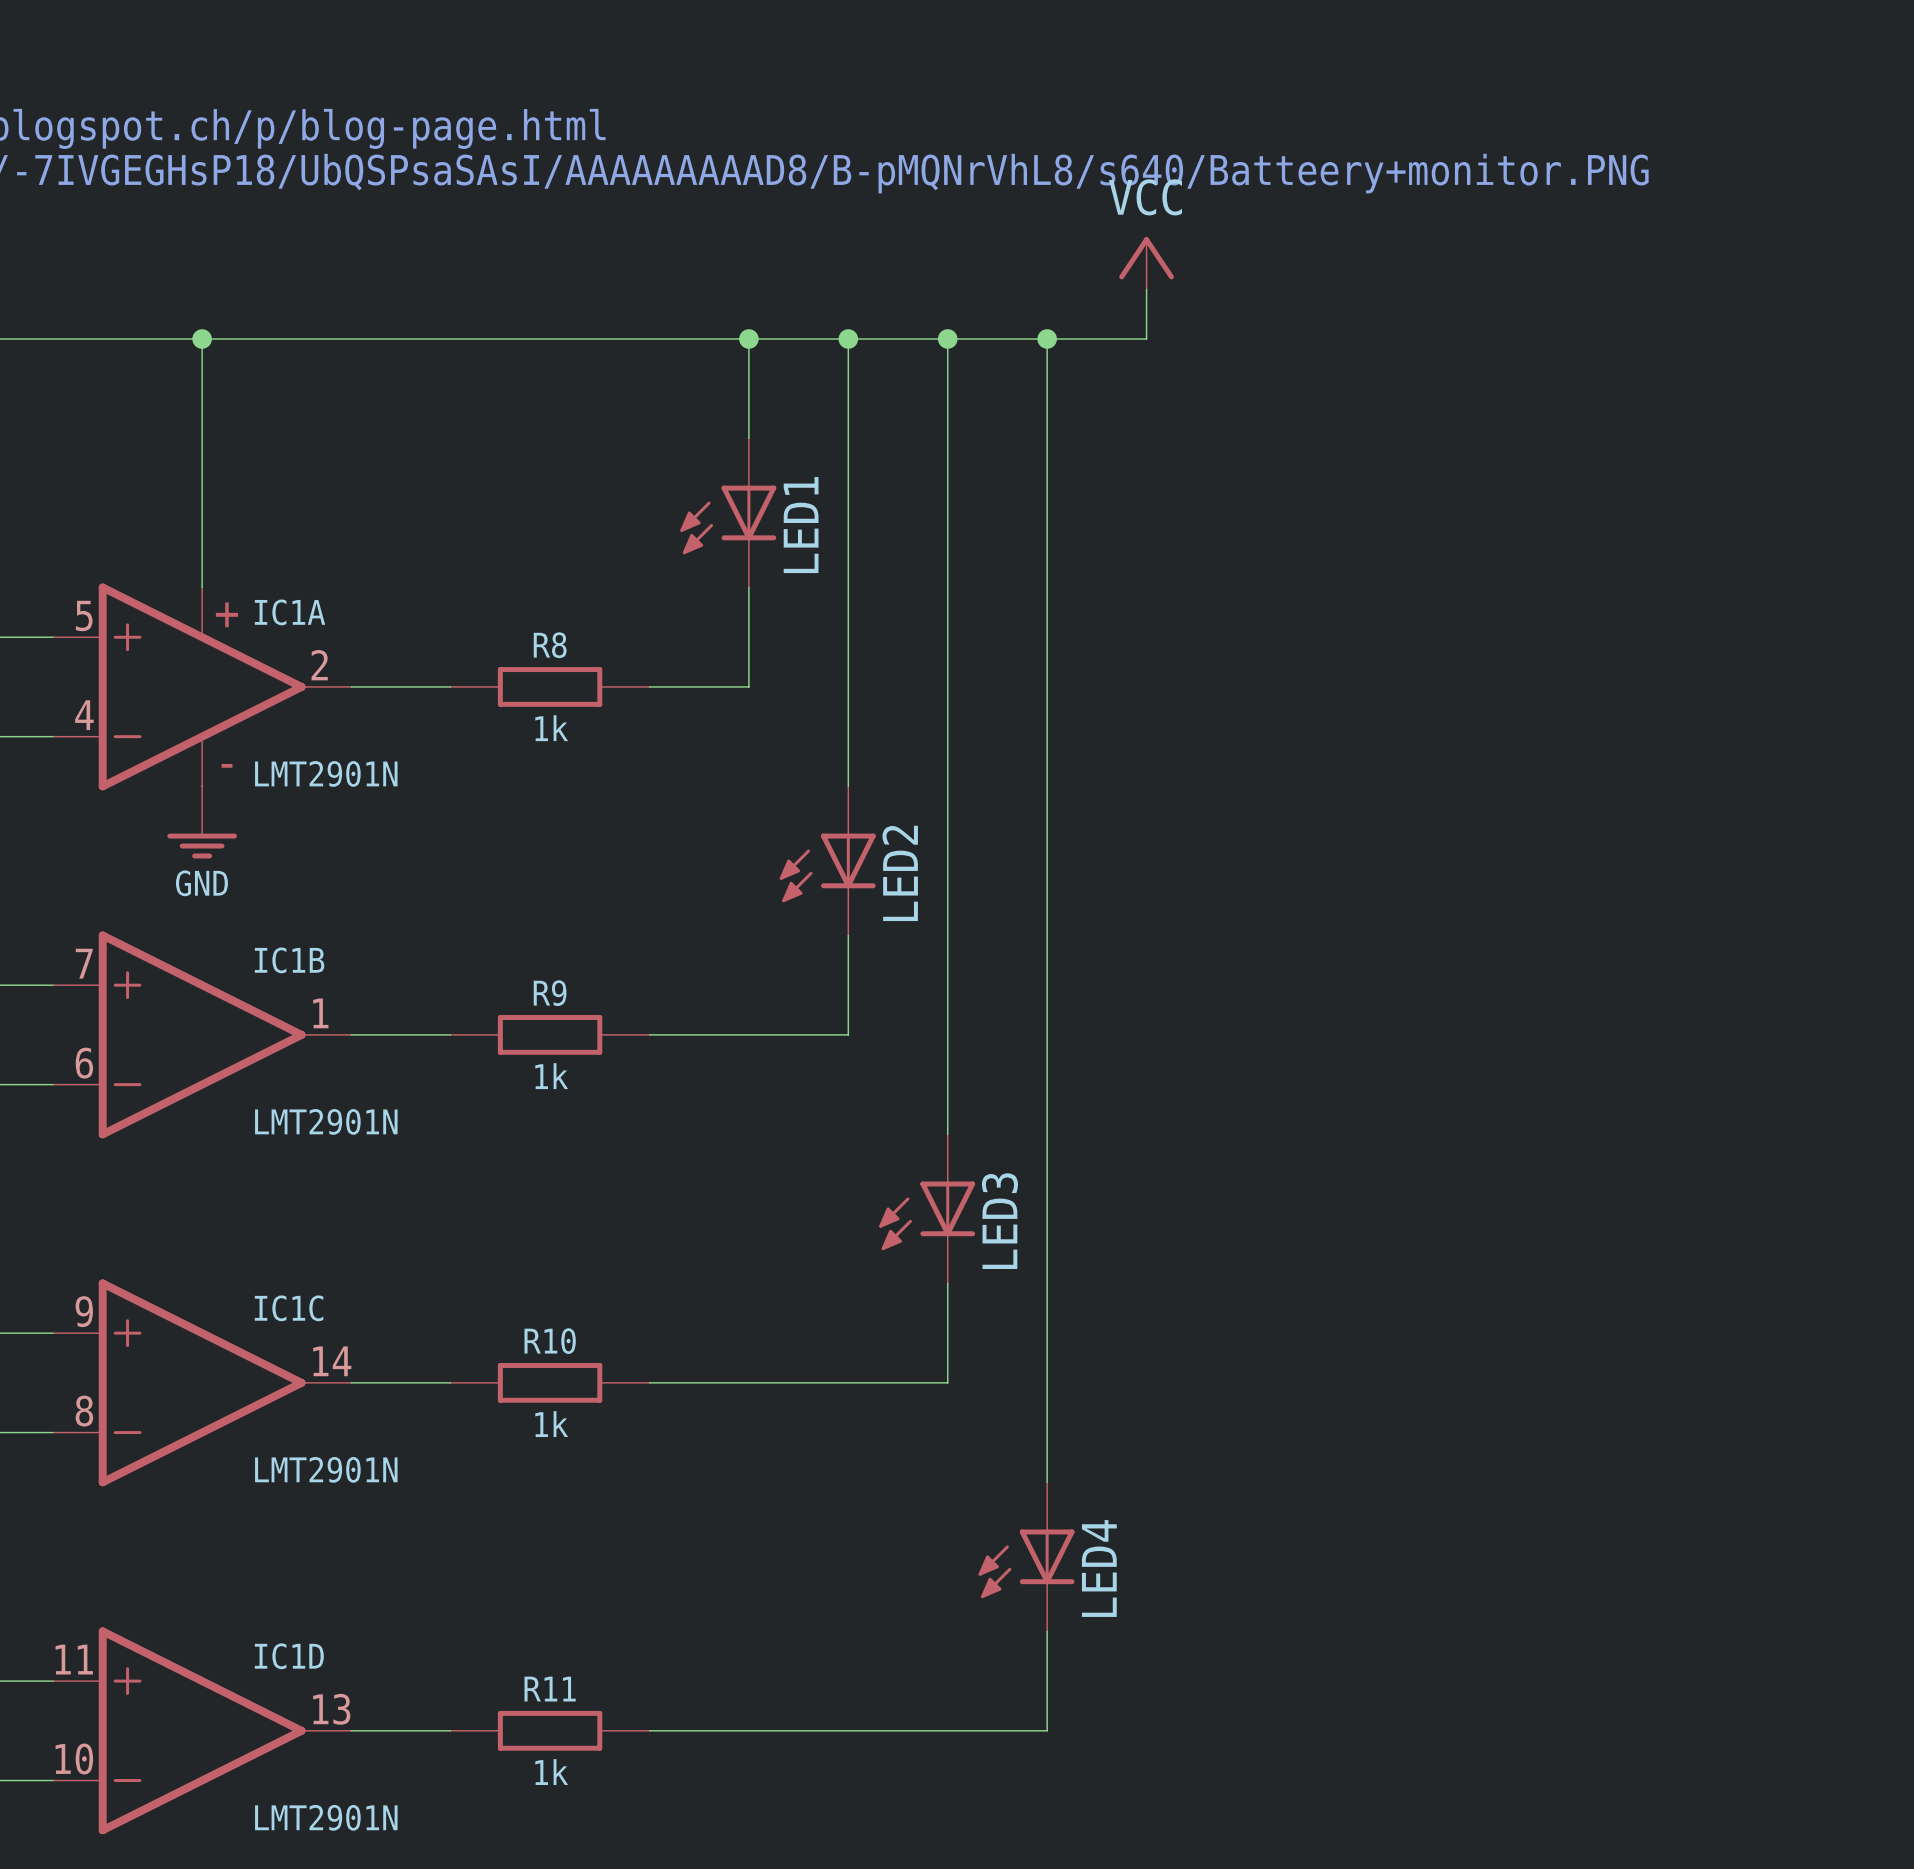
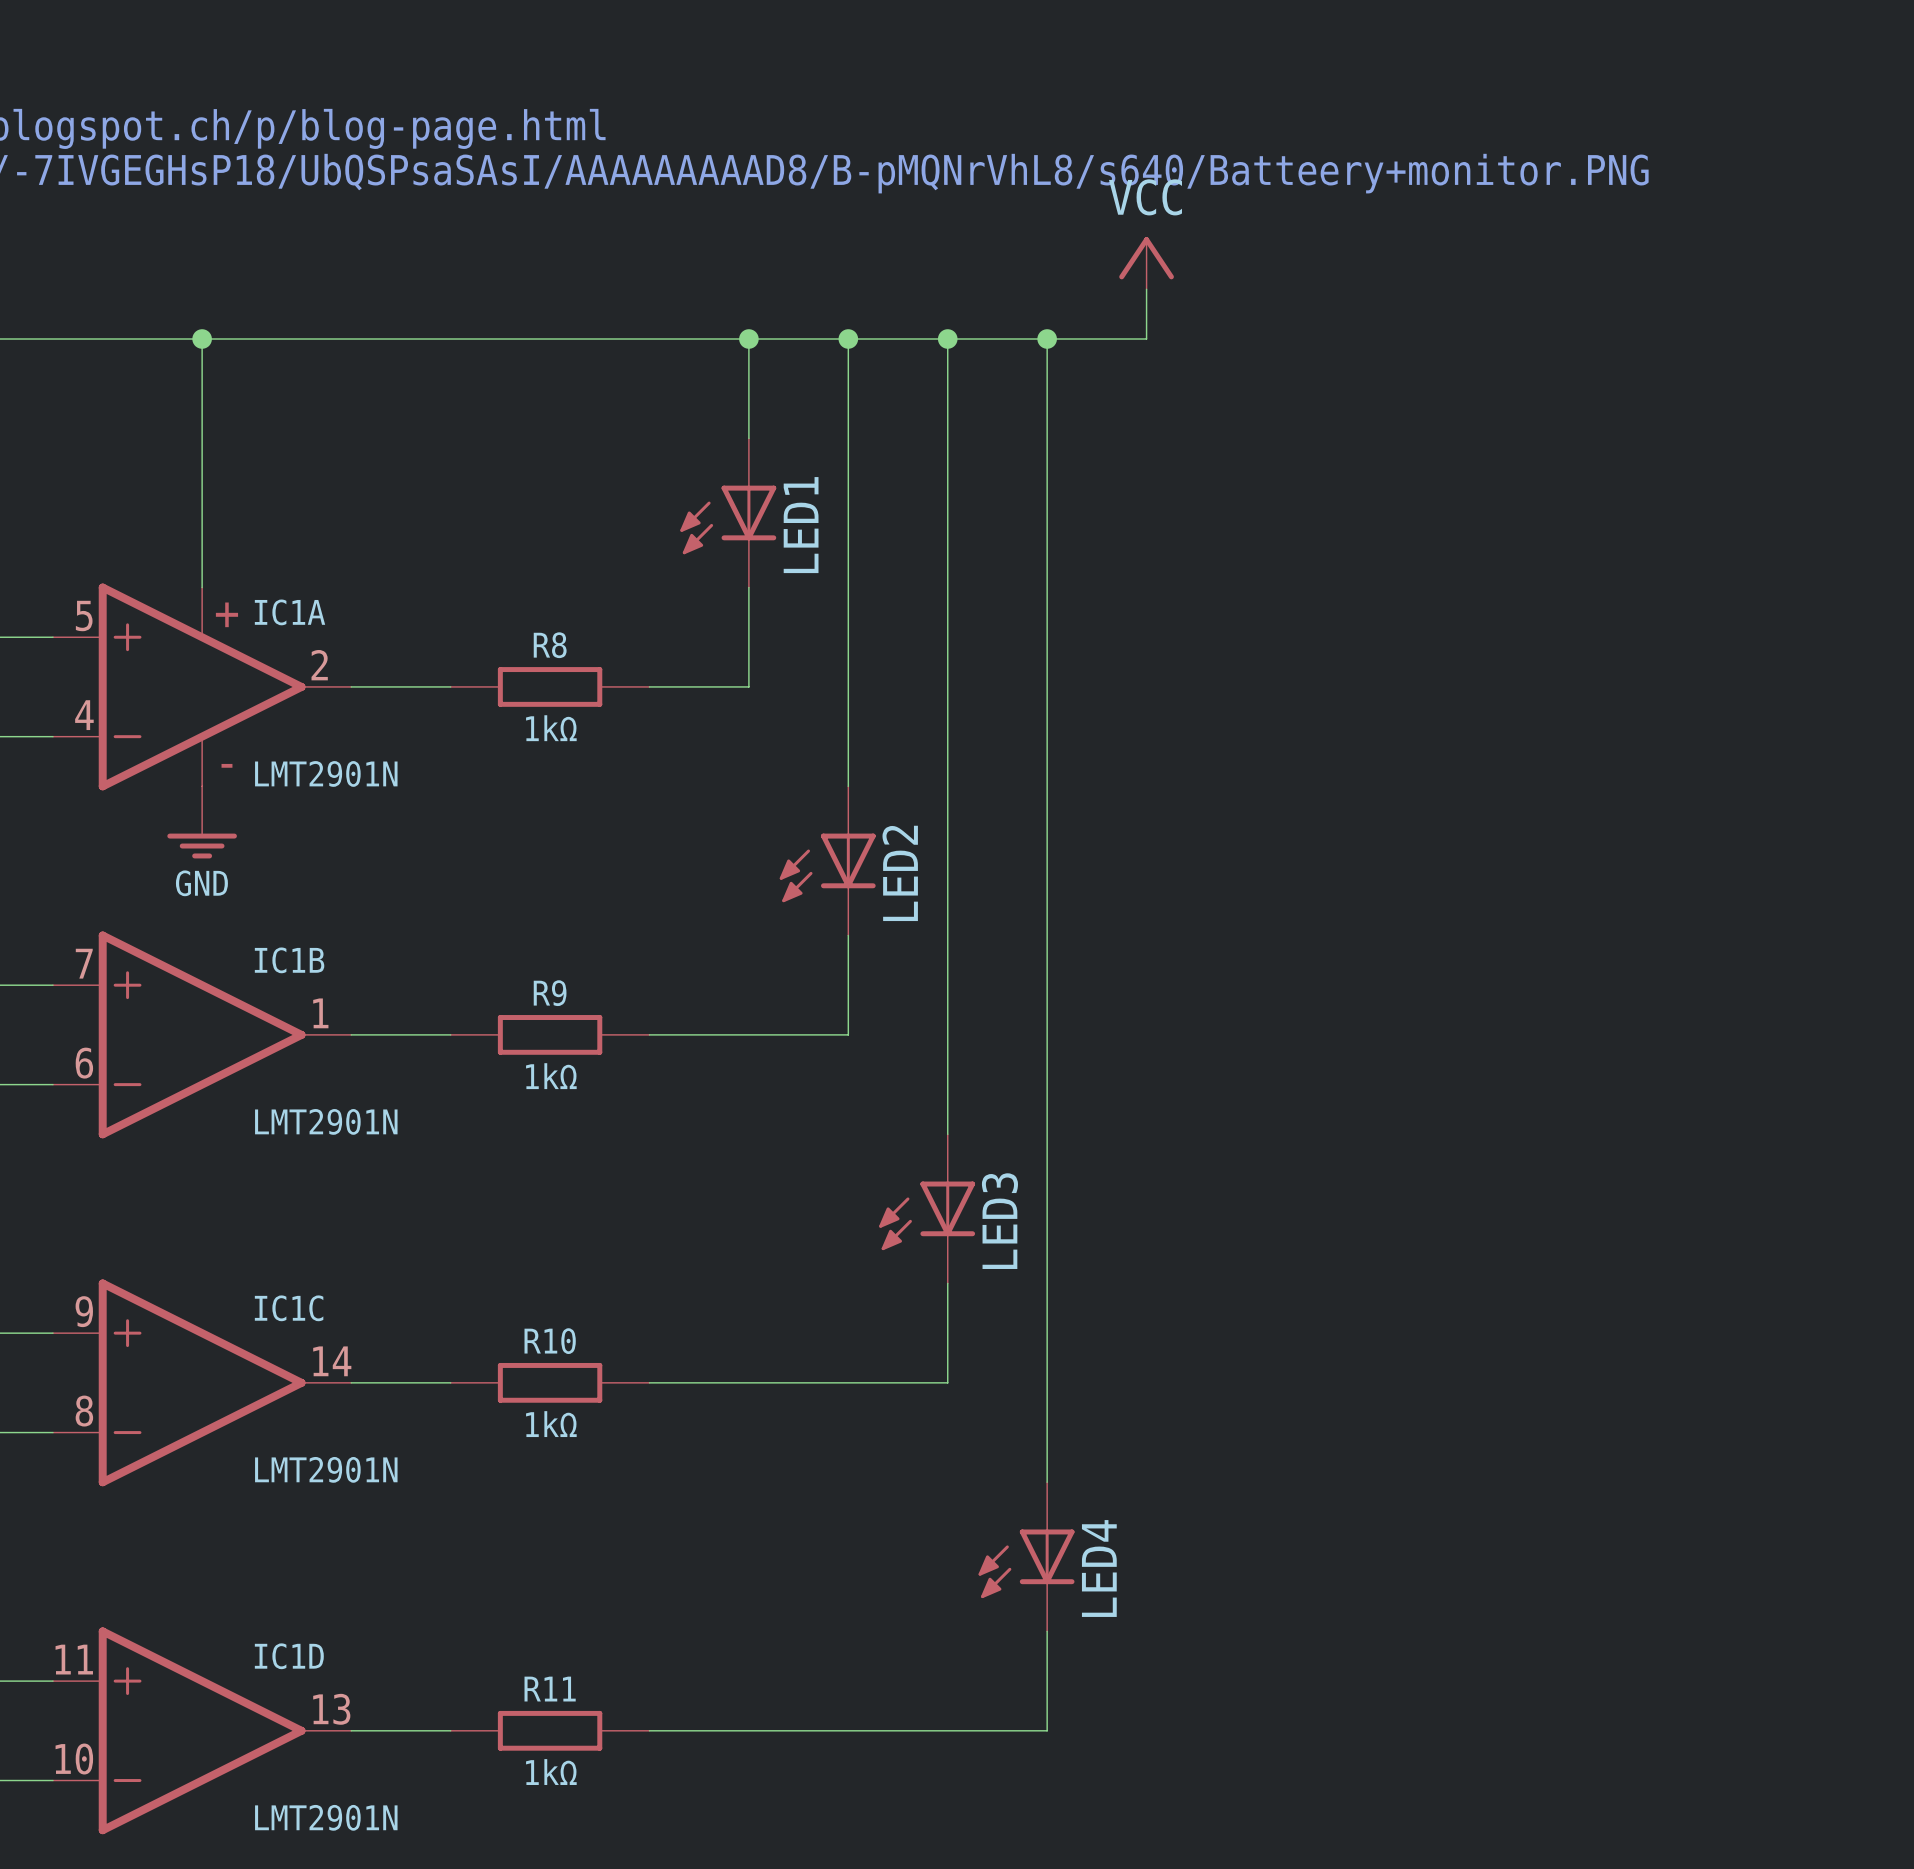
R8 value: 1k (551, 728) -> 1kΩ (551, 728)
R9 value: 1k (551, 1076) -> 1kΩ (551, 1076)
R10 value: 1k (551, 1424) -> 1kΩ (551, 1424)
R11 value: 1k (551, 1772) -> 1kΩ (551, 1772)

